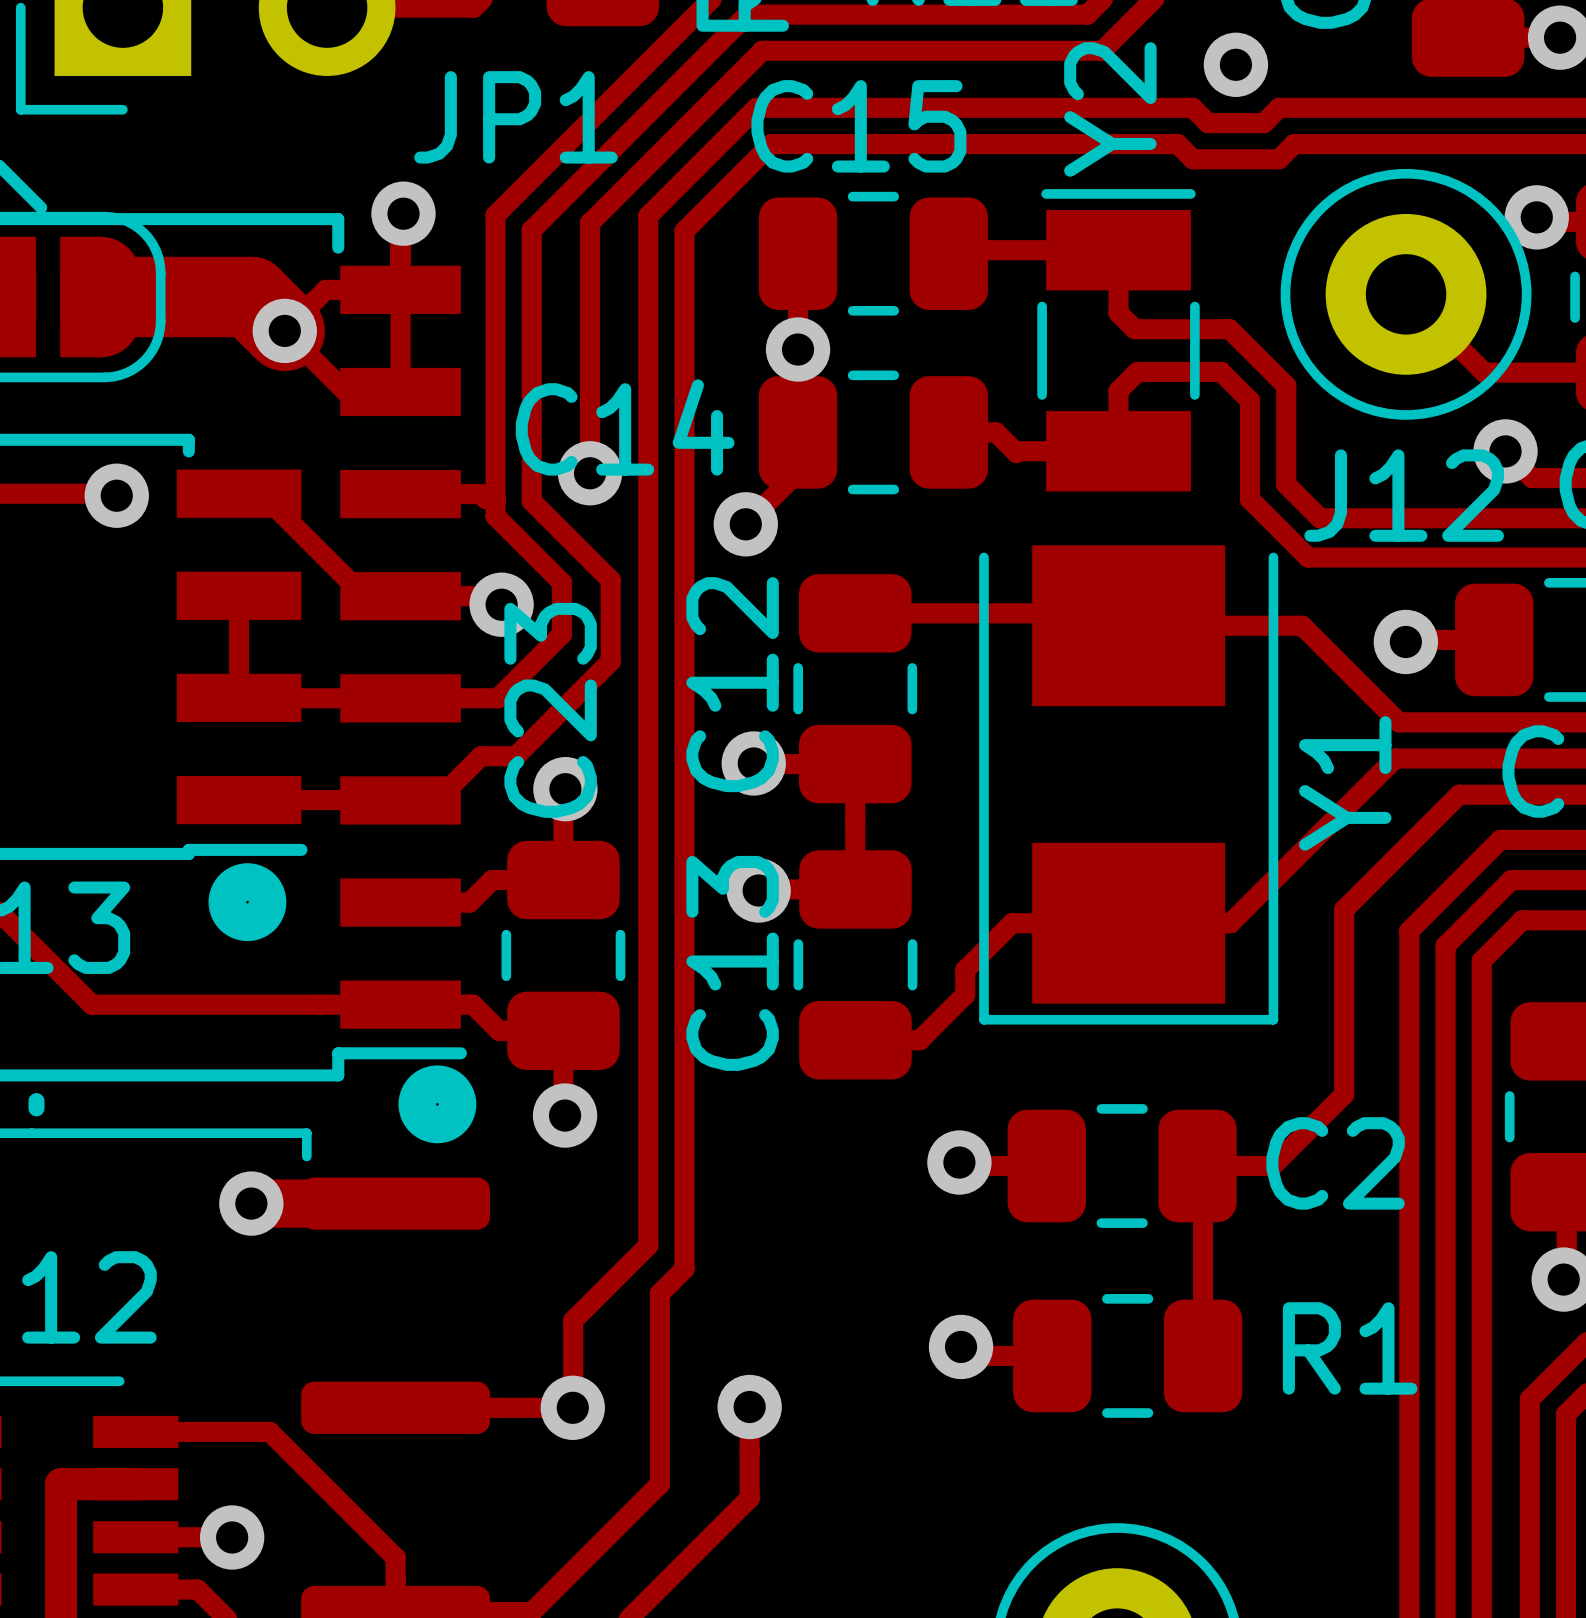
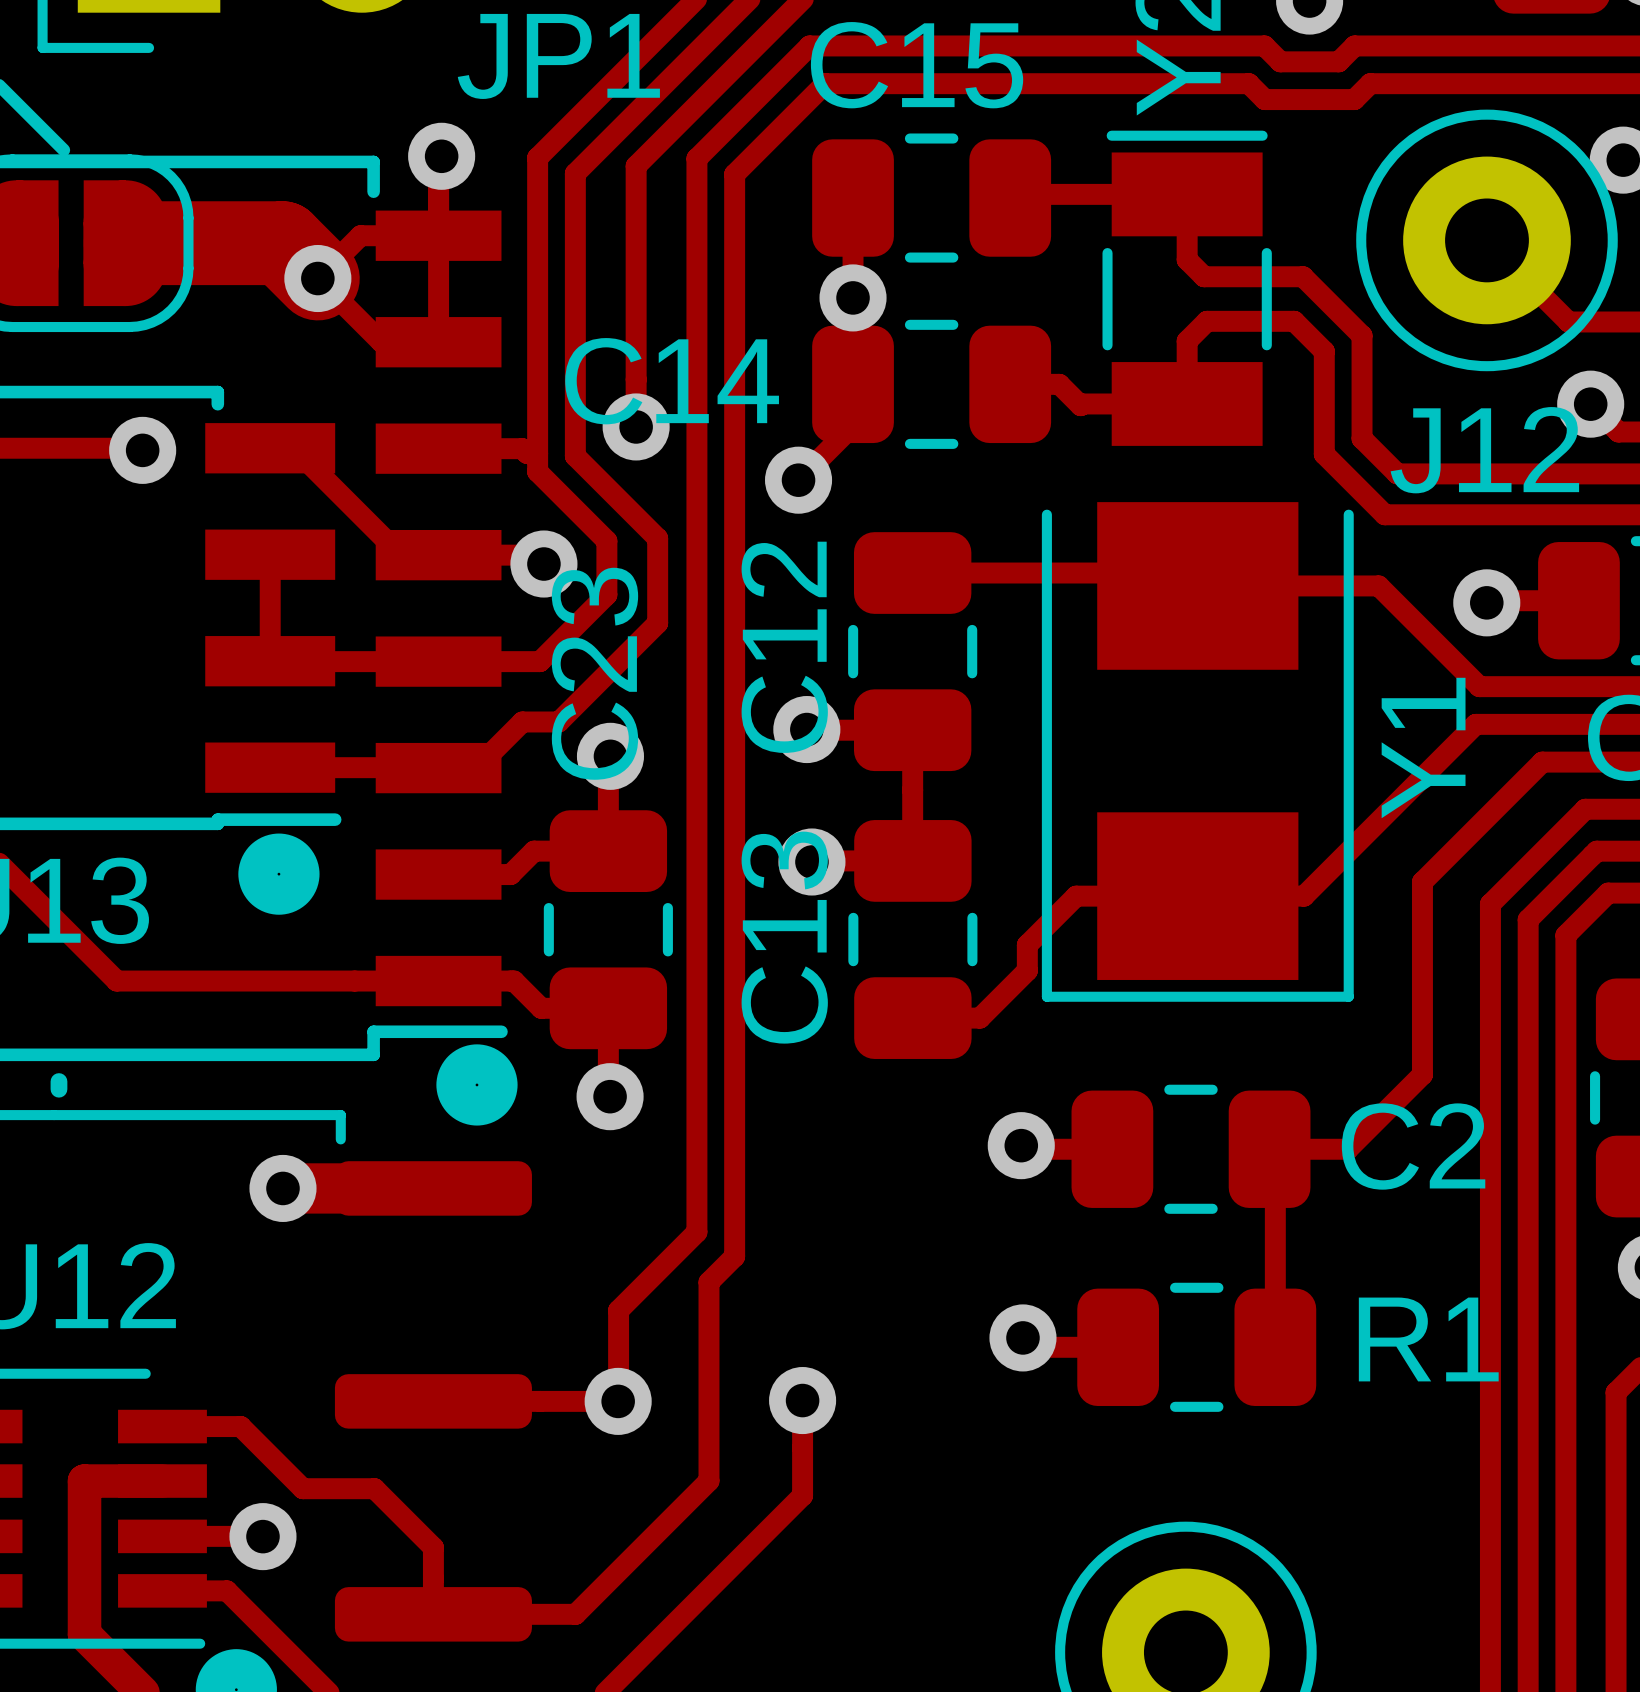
track: (210, 1431) (269, 1431) (395, 1557) -> (240, 1426) (302, 1488) (374, 1488) (433, 1547) (433, 1557)

